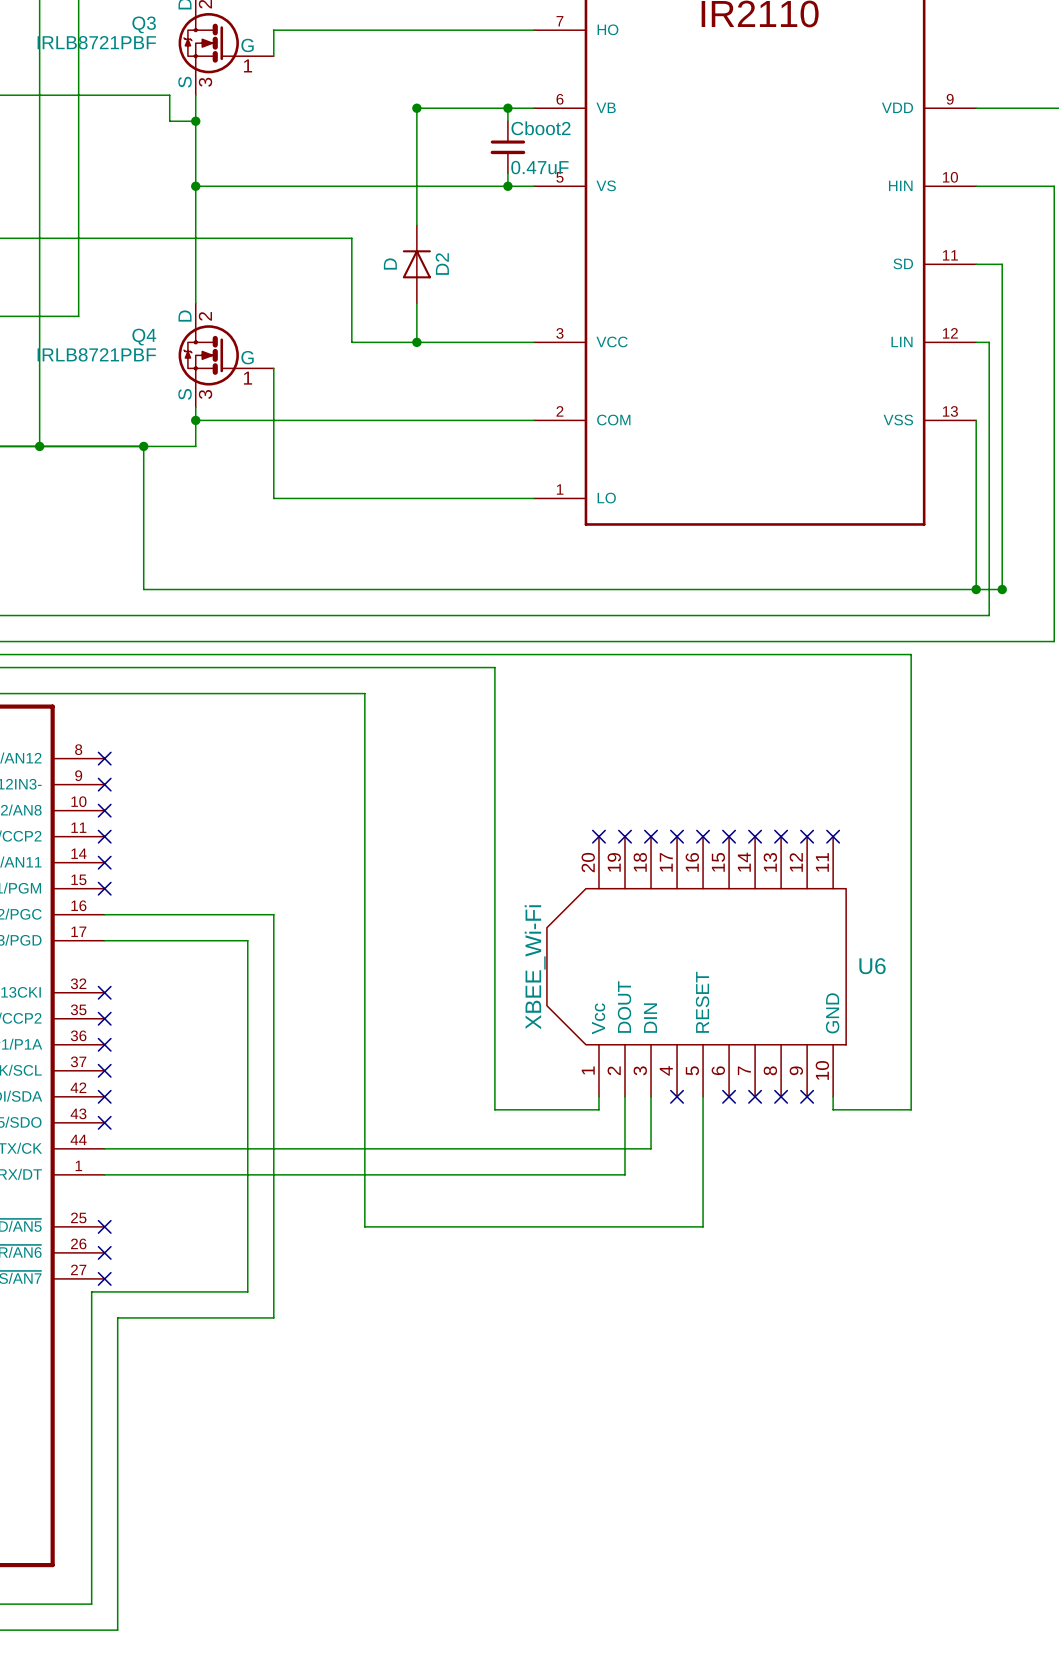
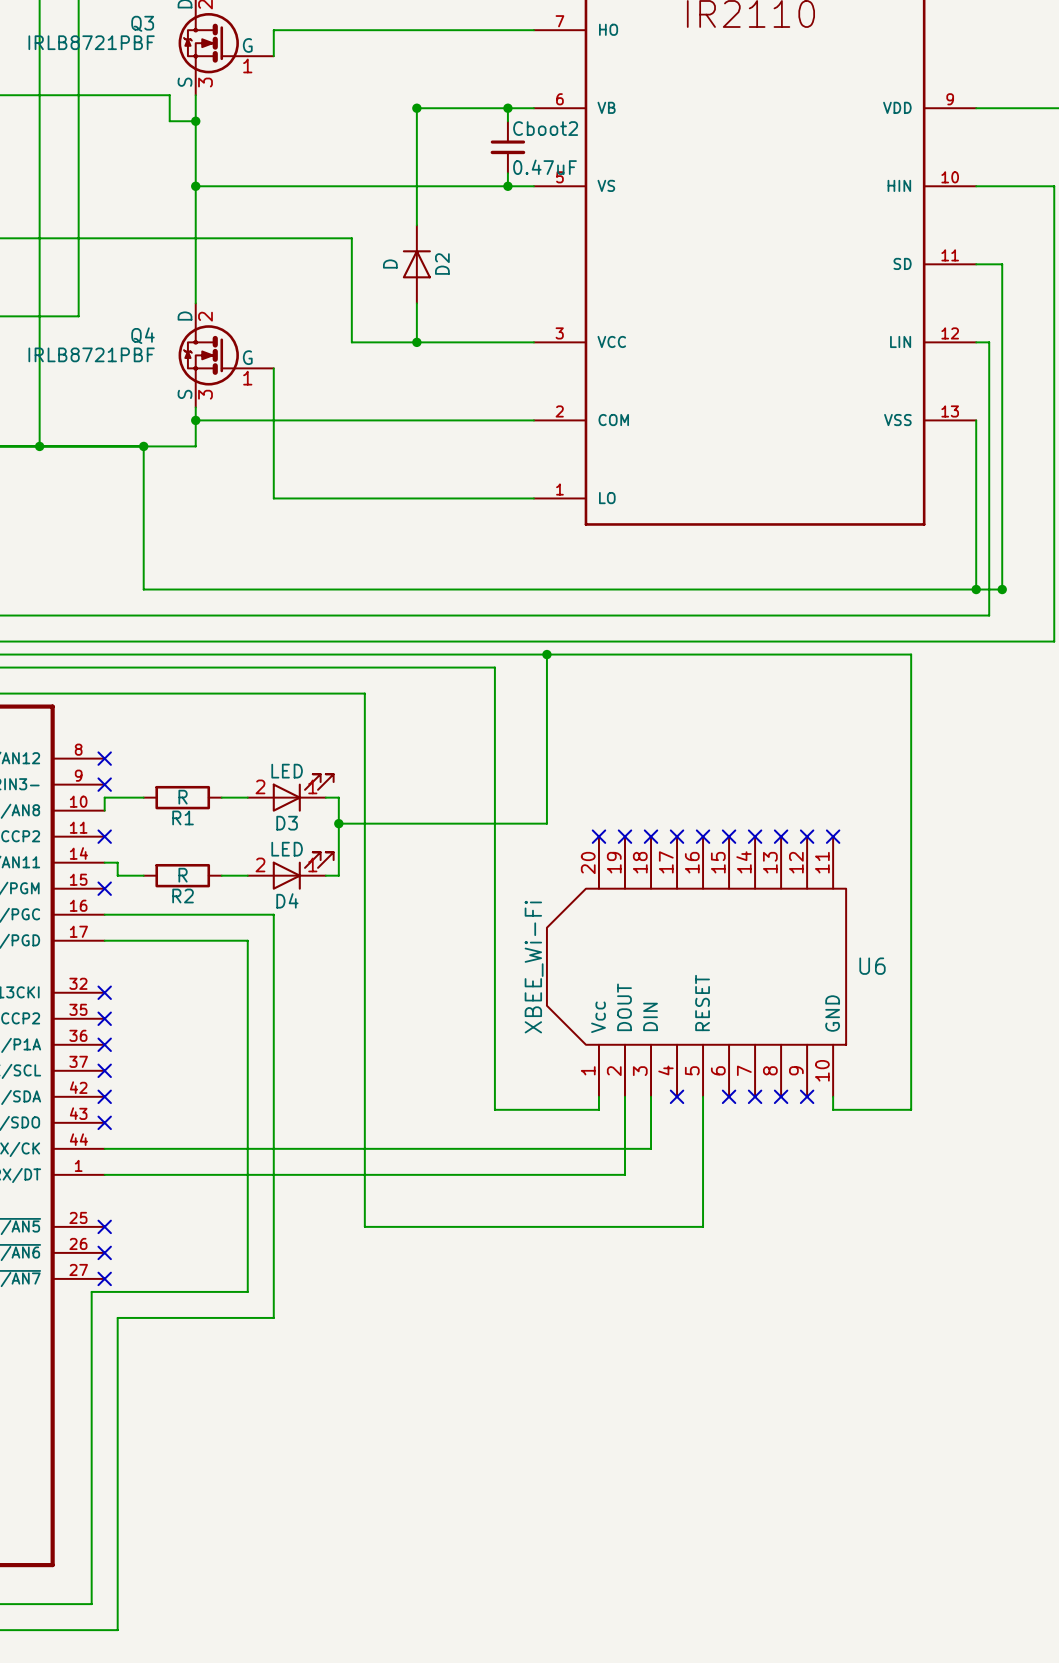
wire: none -> (546, 654) (546, 823) (338, 823)
junction: none -> (546, 654)
D3: none -> LED (290, 792)
wire: none -> (143, 797) (104, 797) (104, 810)
R1: none -> R (182, 797)
wire: none -> (221, 797) (247, 797)
wire: none -> (325, 797) (338, 797) (338, 875) (325, 875)
no-connect mark: (104, 810) -> none
junction: none -> (338, 823)
wire: none -> (104, 862) (117, 862) (117, 875) (143, 875)
no-connect mark: (104, 862) -> none
D4: none -> LED (290, 871)
R2: none -> R (182, 875)
wire: none -> (221, 875) (247, 875)

